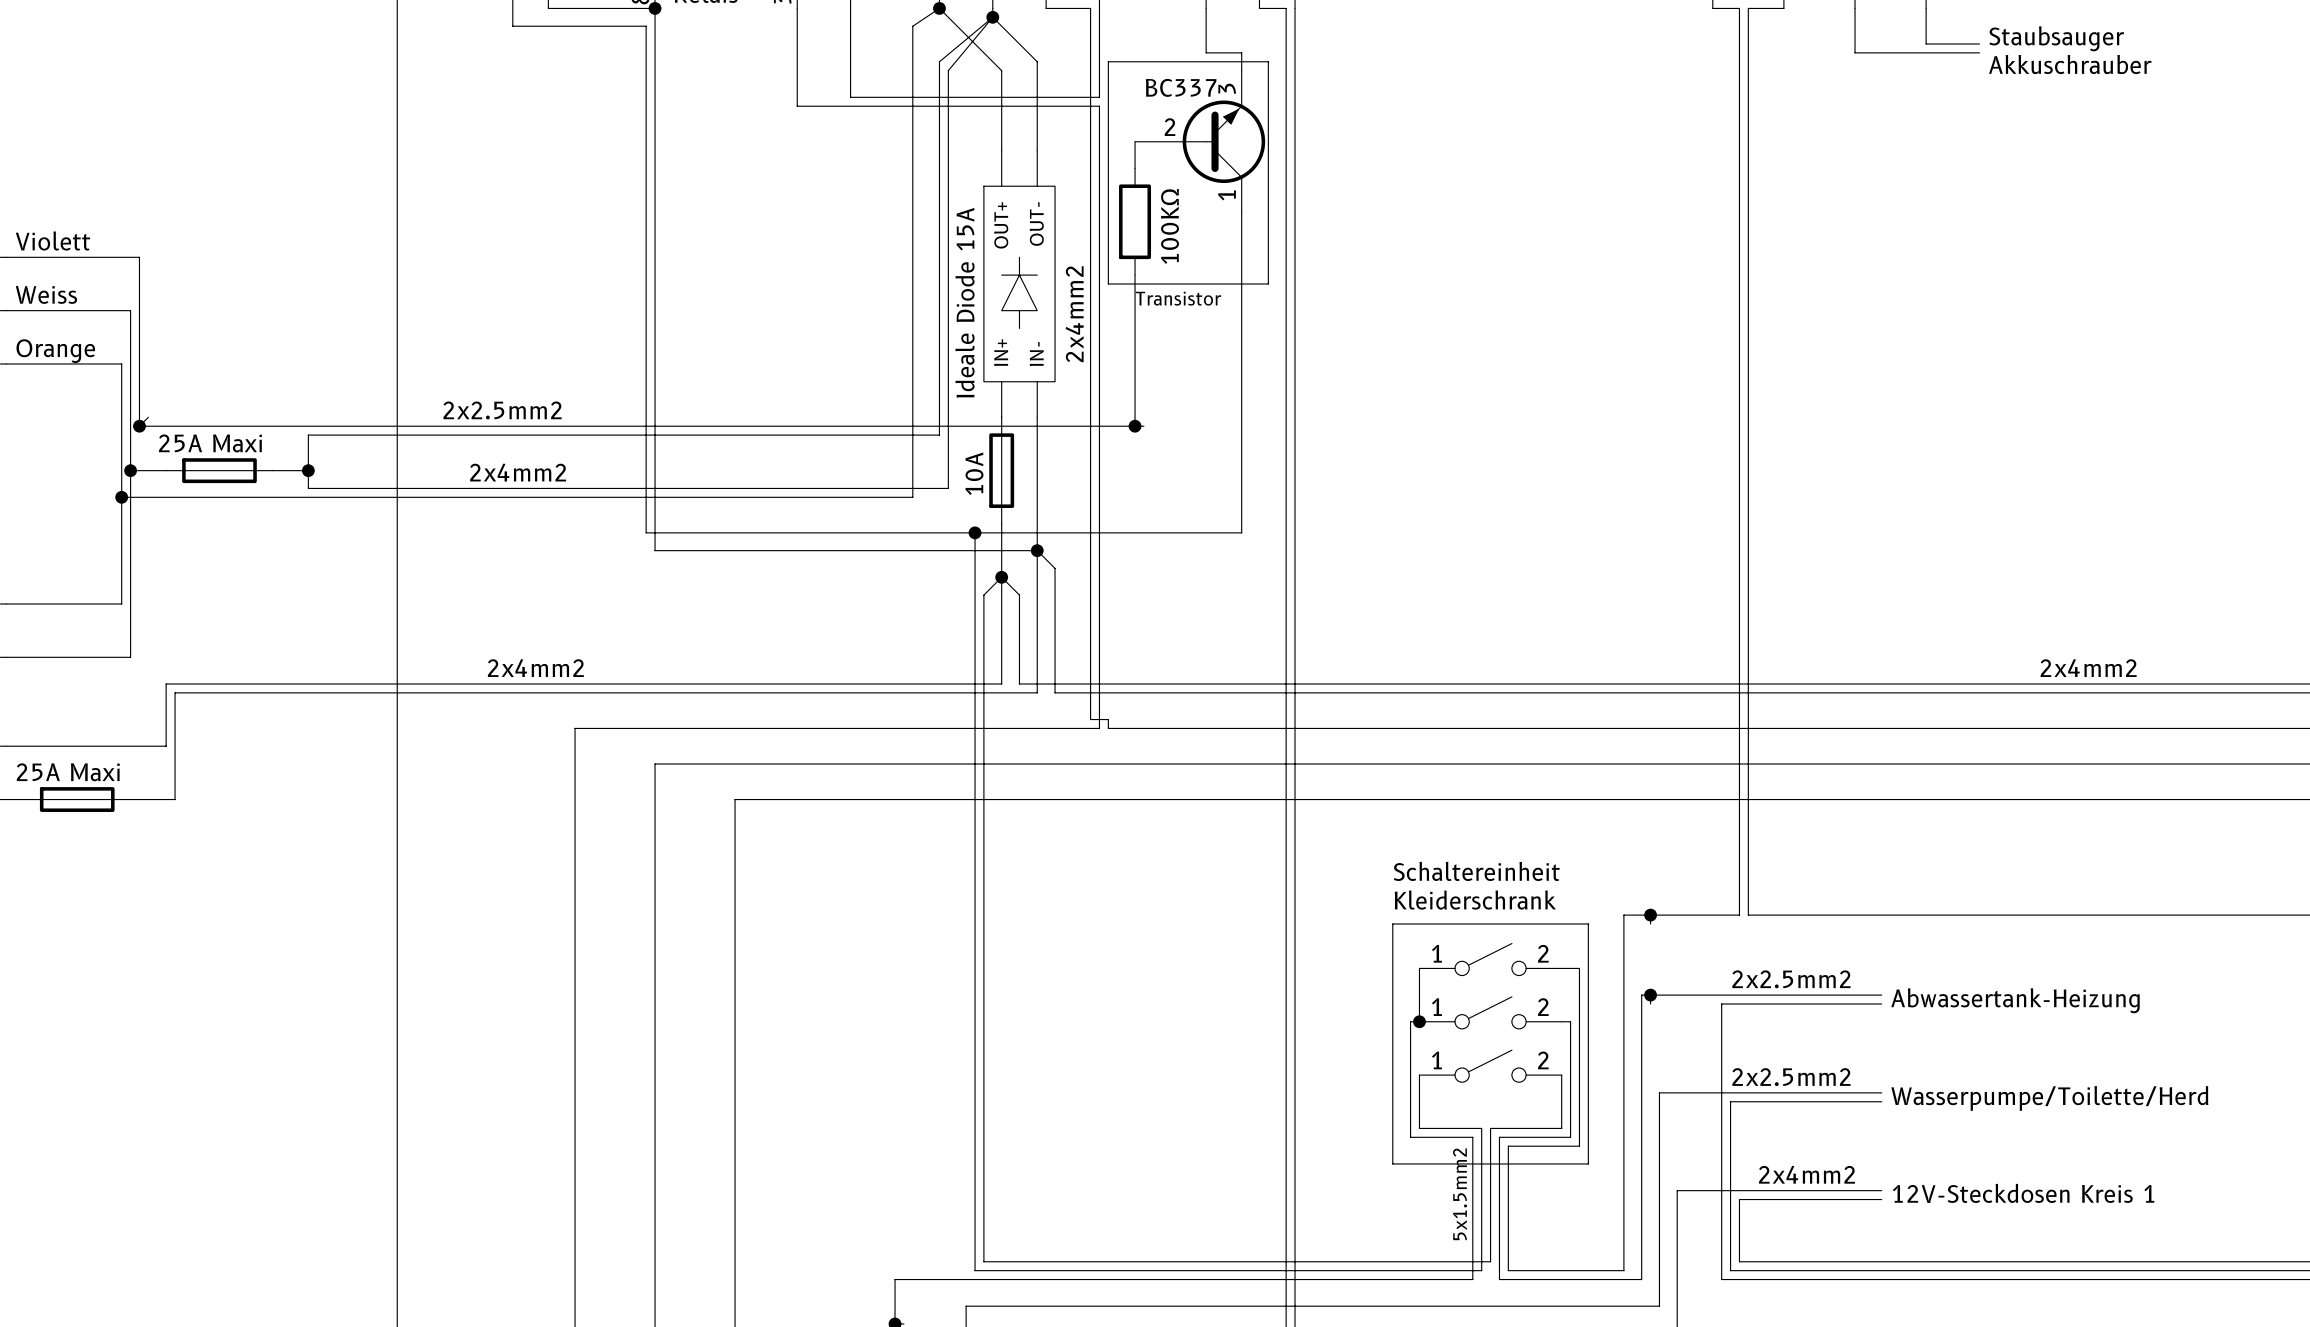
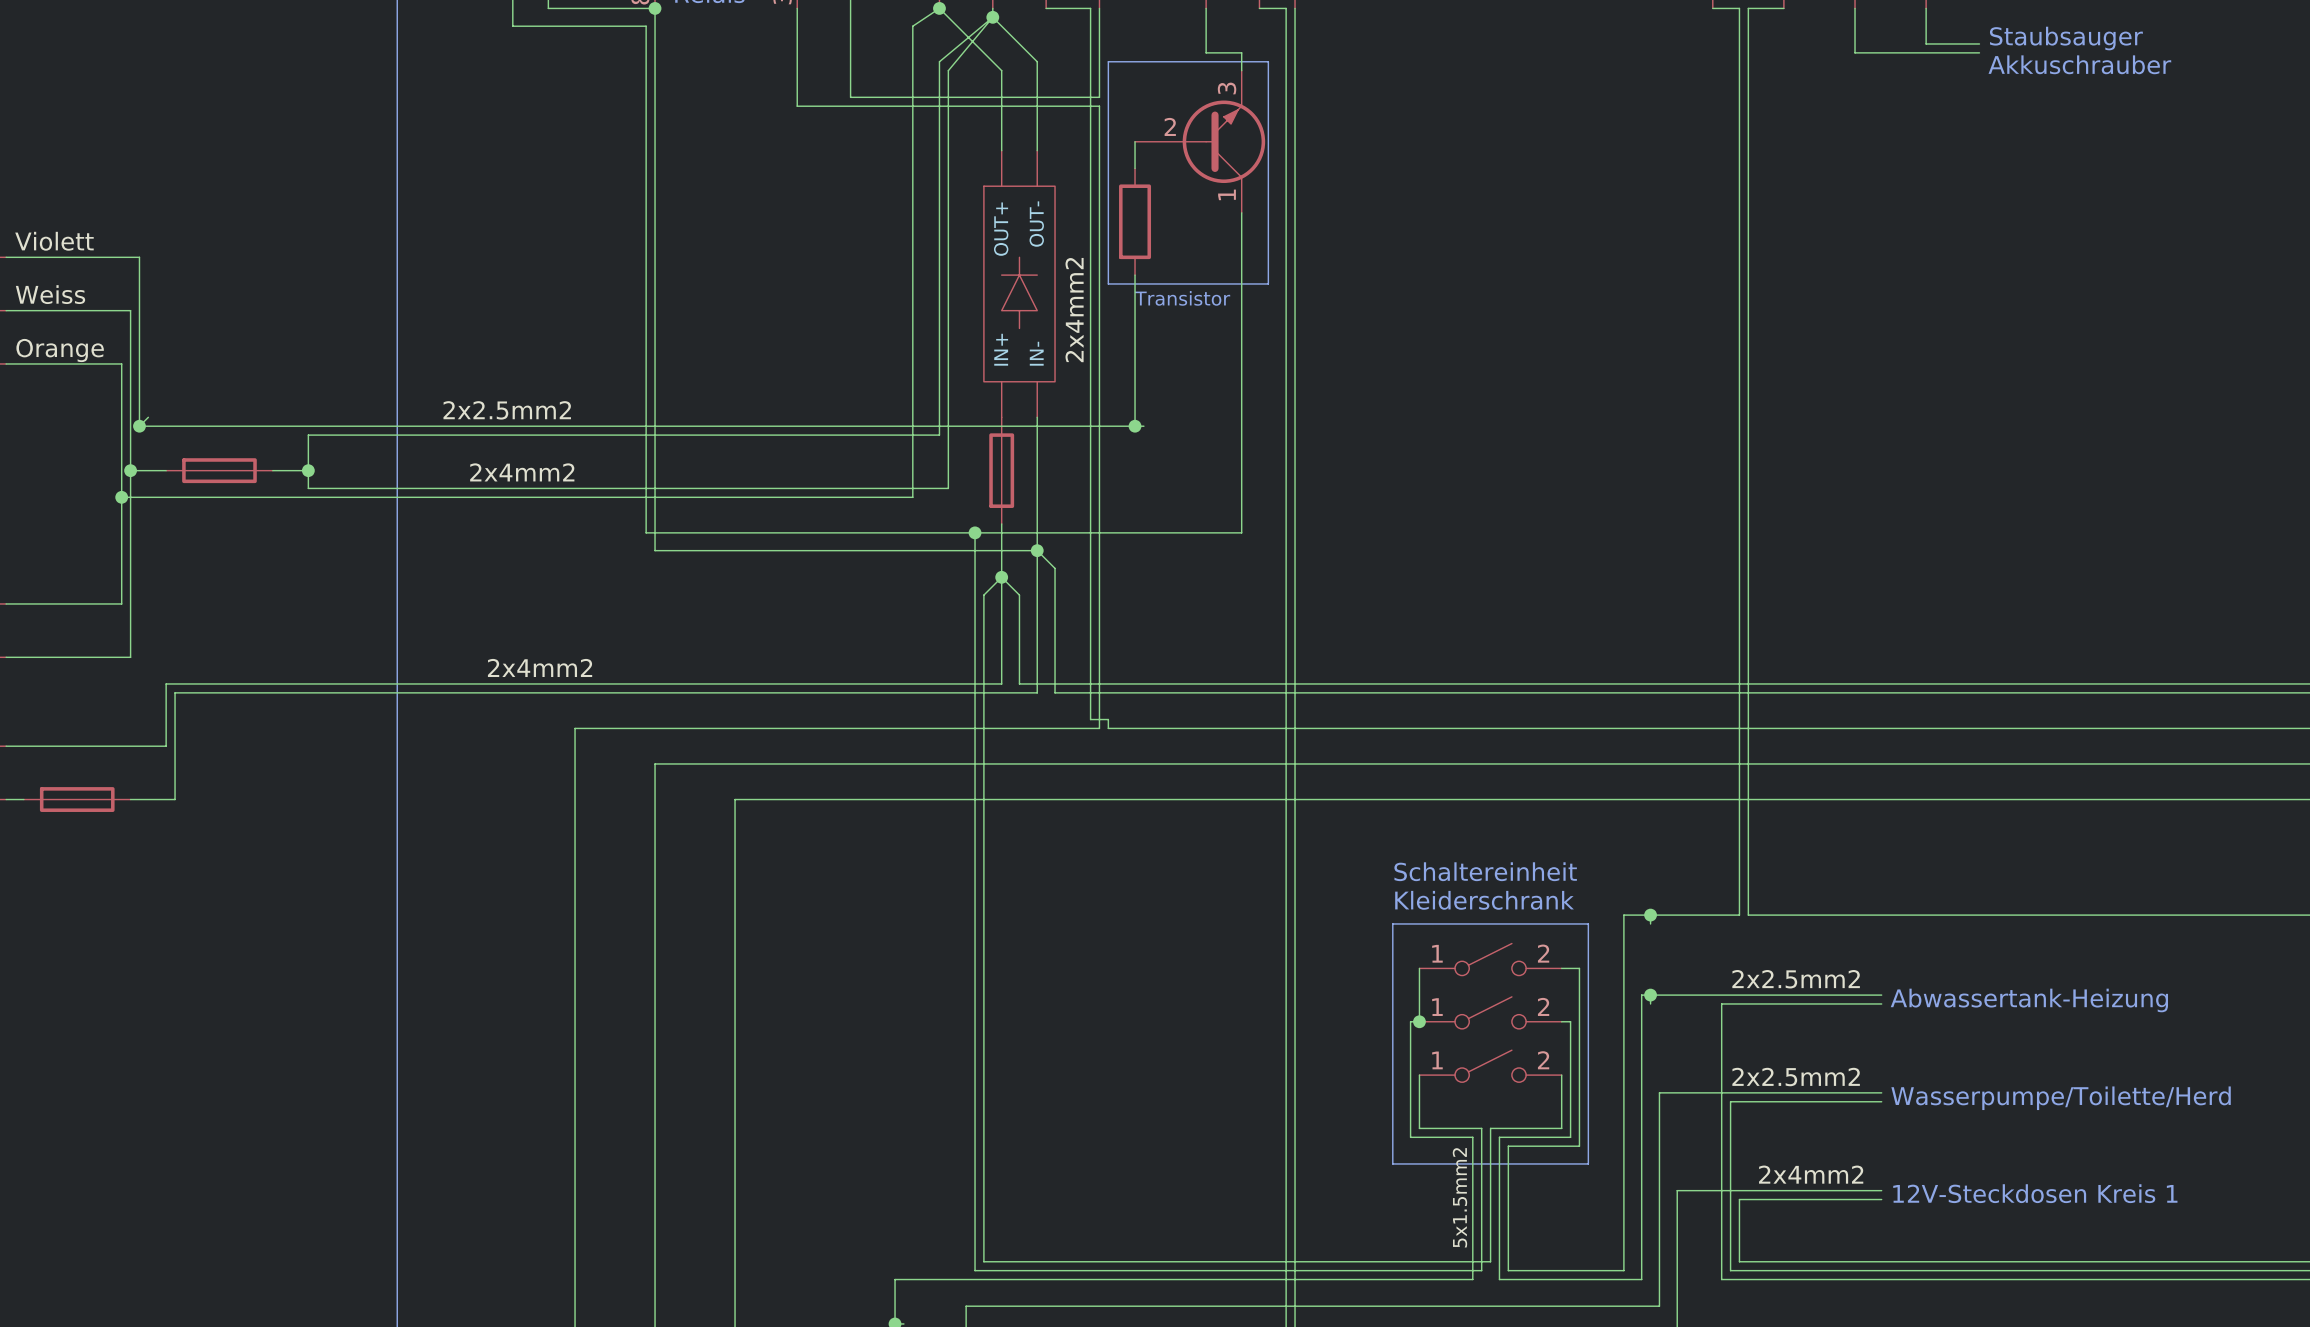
part value: BC337 (1181, 87) -> none
part value: 100KΩ (1170, 226) -> none
part value: Ideale Diode 15A (964, 302) -> none
part value: 25A Maxi (210, 443) -> none
part value: 10A (974, 473) -> none
label: 2x4mm2 (2088, 668) -> none
part value: 25A Maxi (68, 772) -> none

